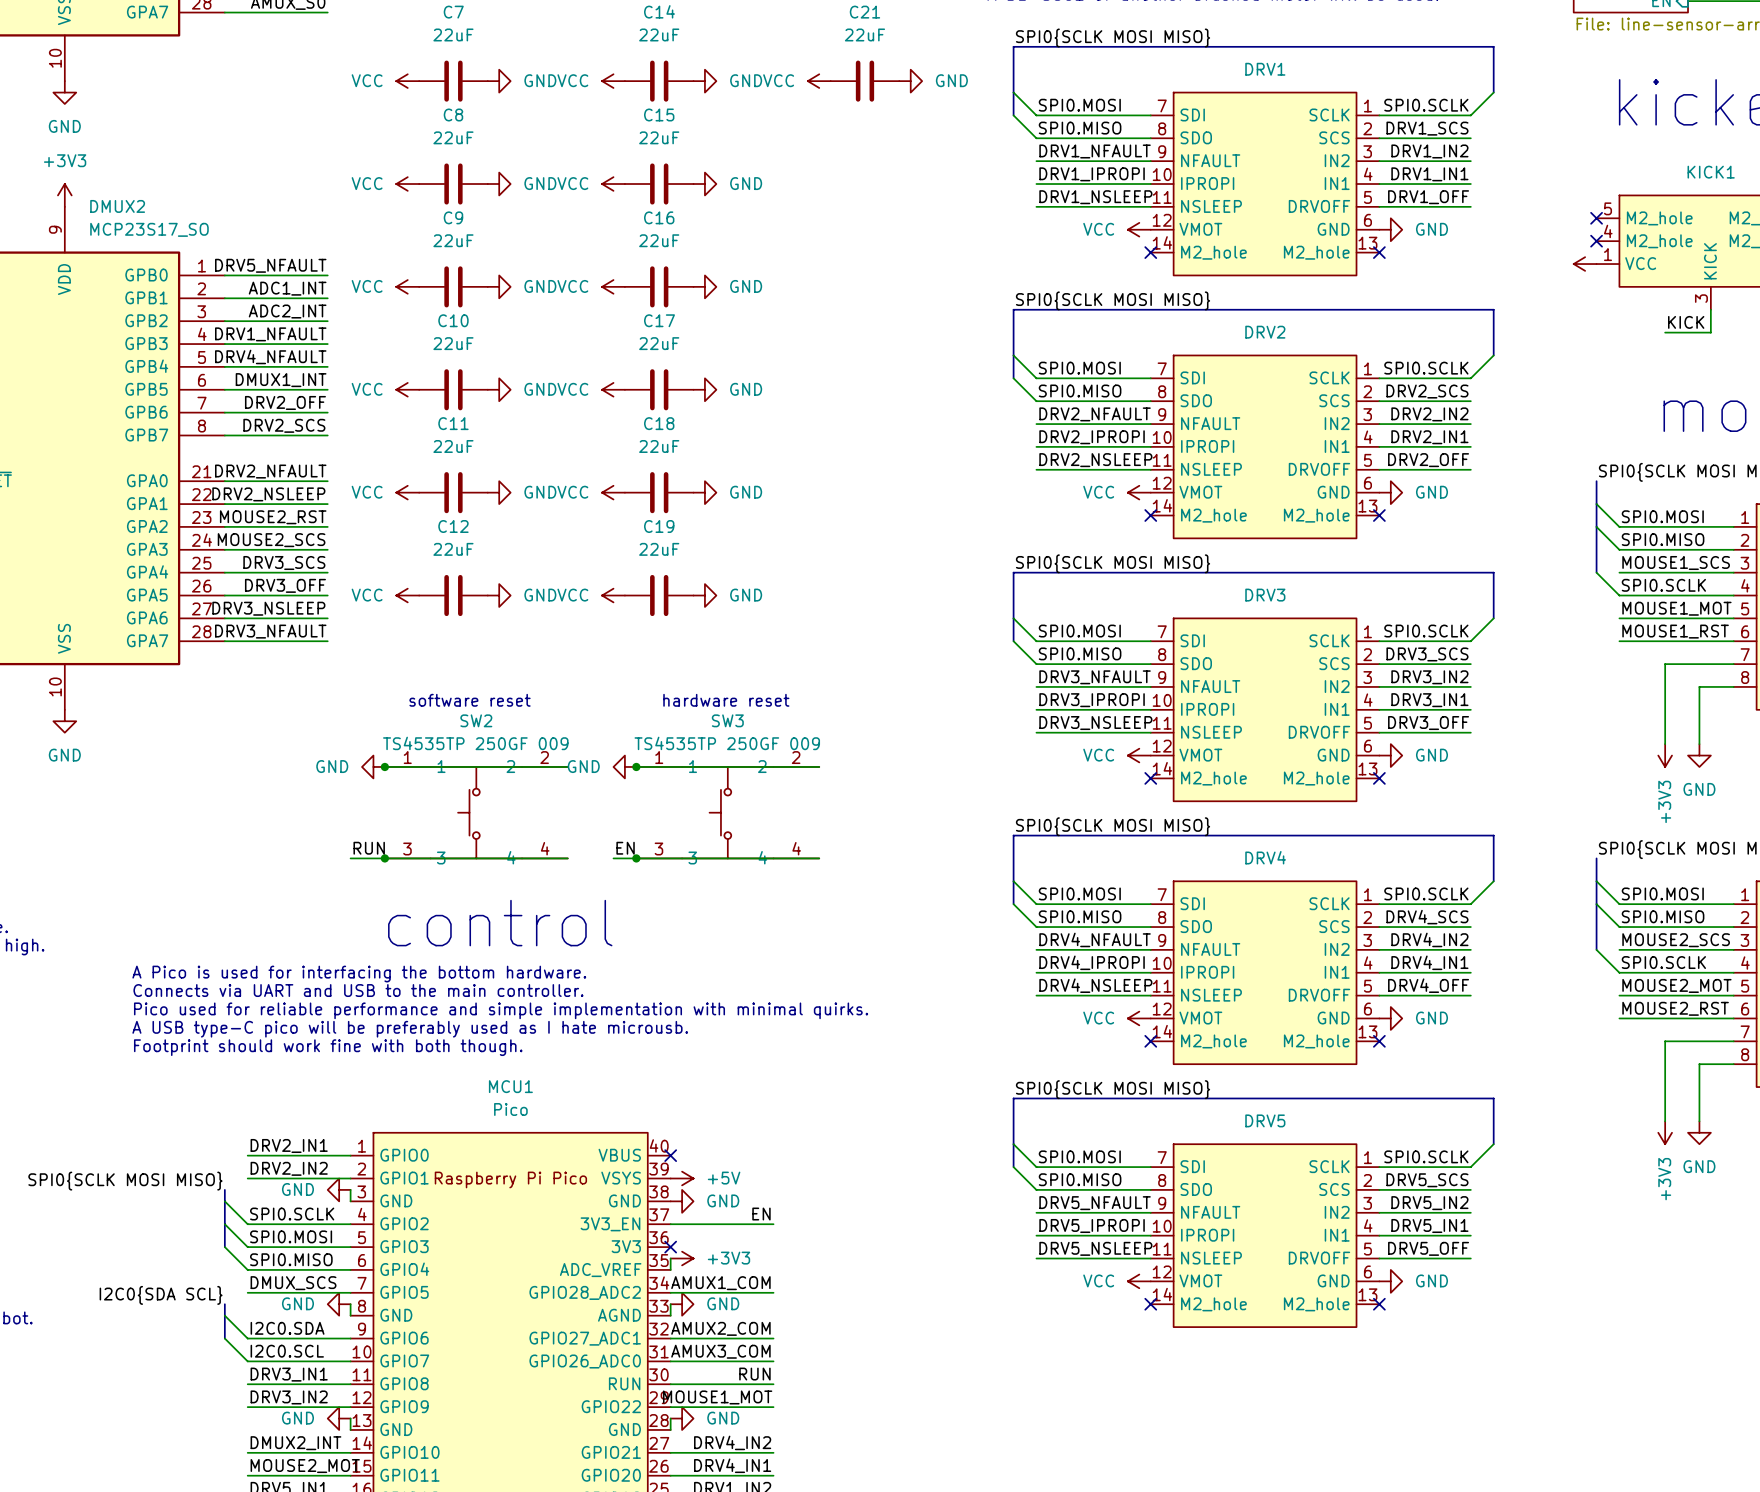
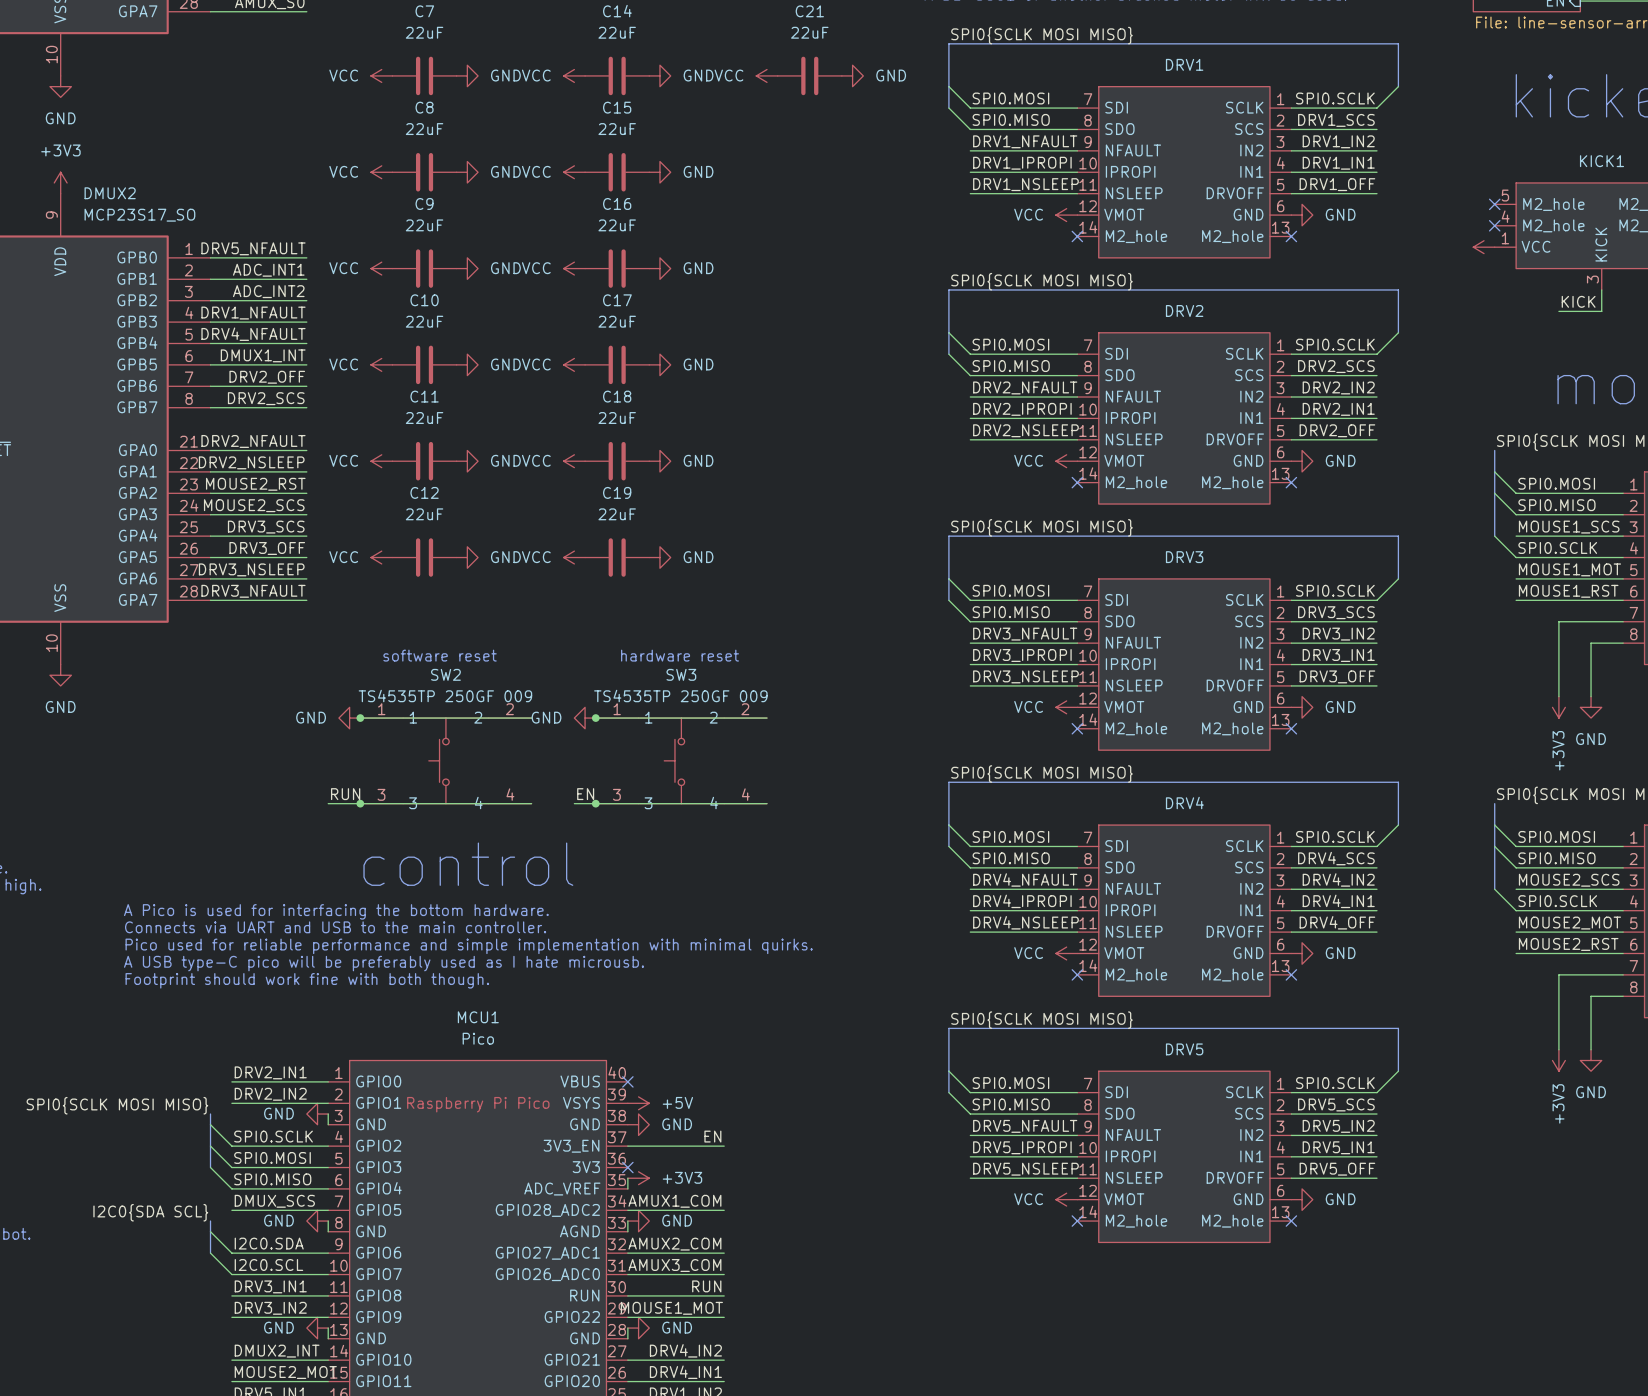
label: ADC1_INT (287, 288) -> ADC_INT1 (268, 270)
label: ADC2_INT (287, 311) -> ADC_INT2 (268, 291)

